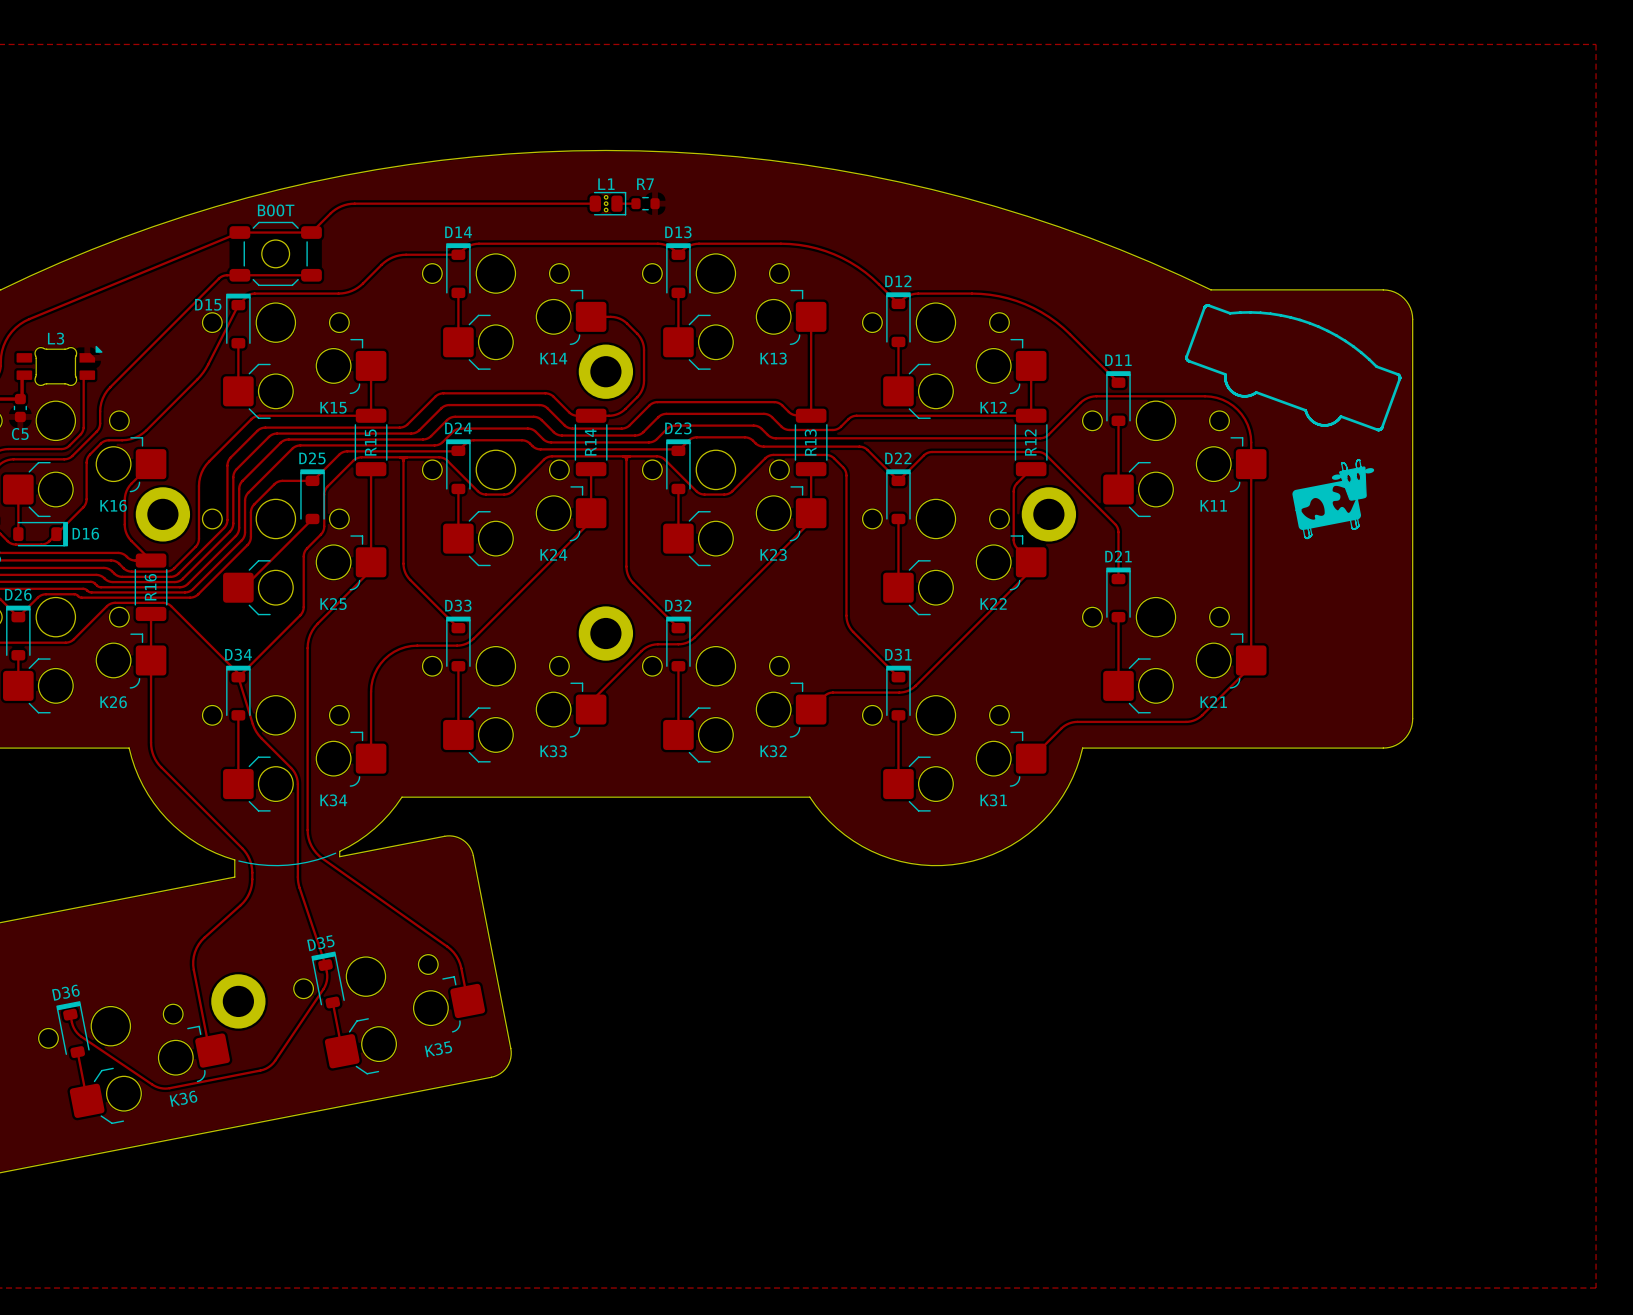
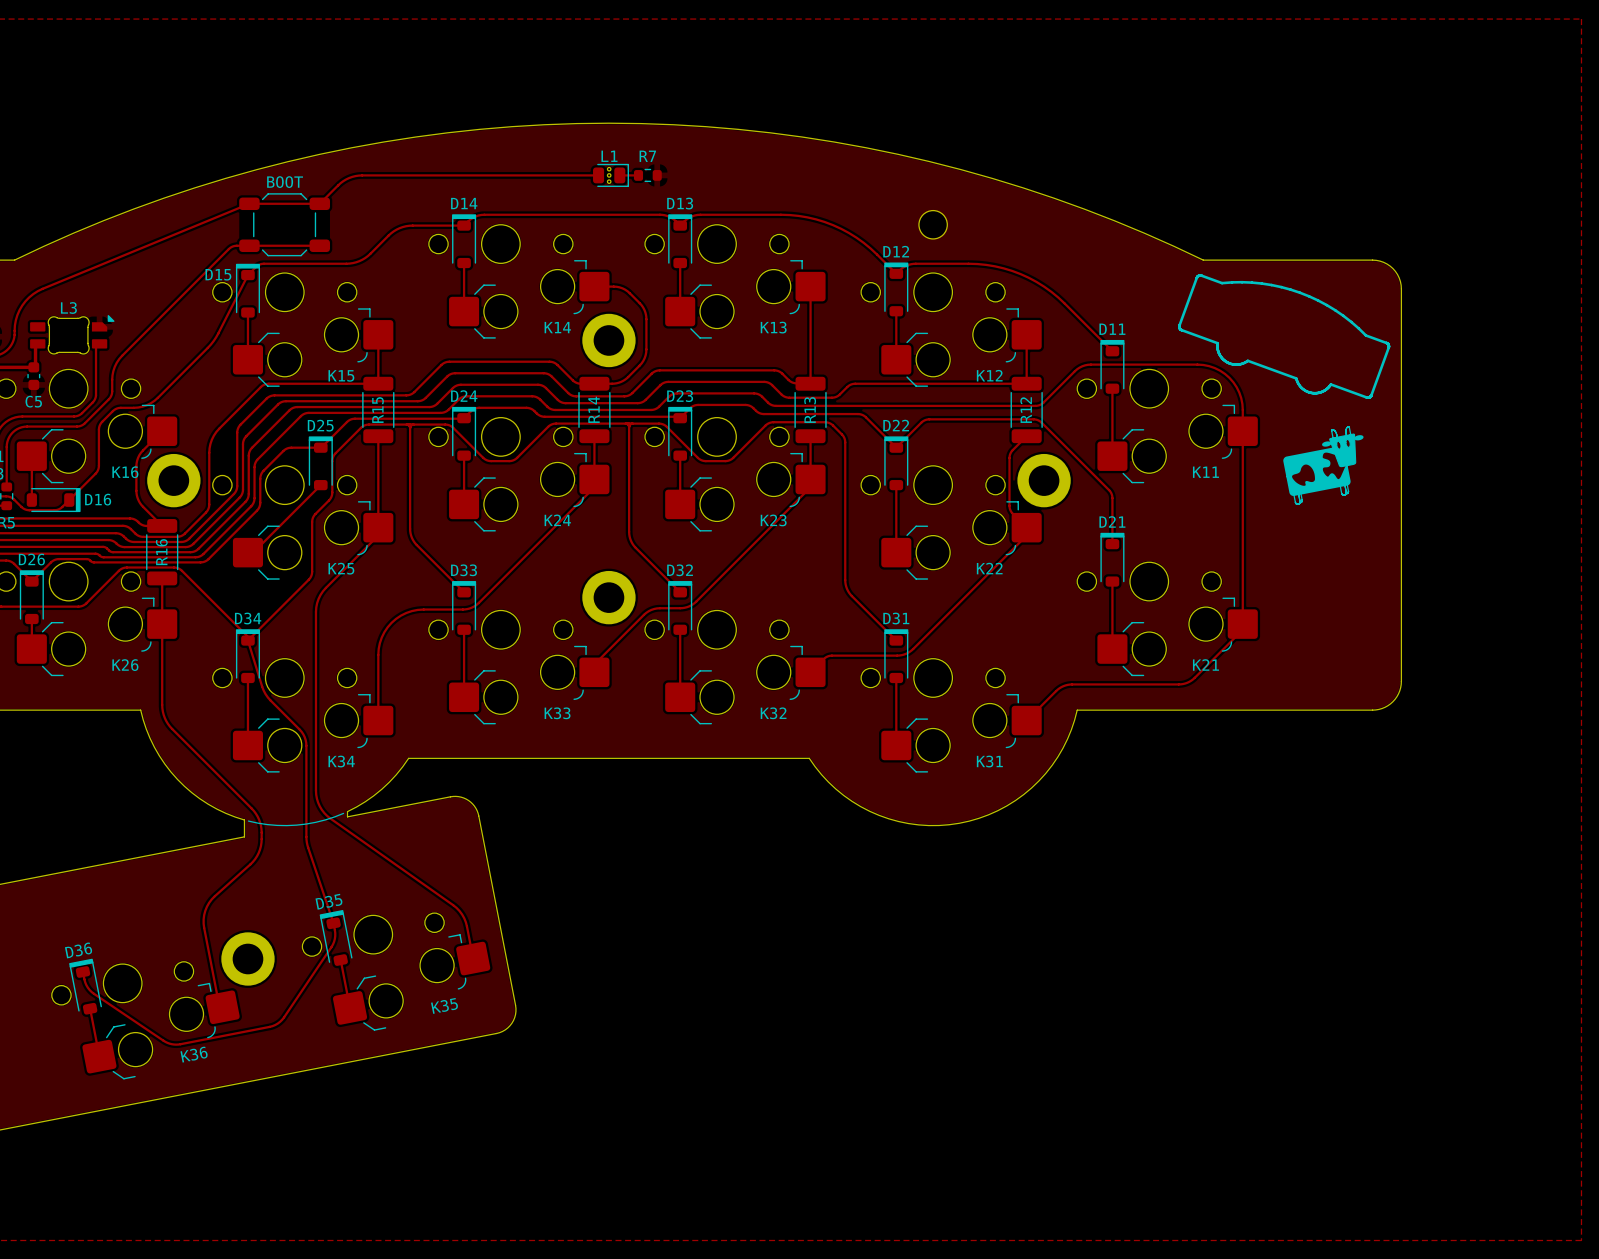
part footprint: [229, 221, 322, 287] -> [239, 193, 330, 257]
part: none -> (933, 224)

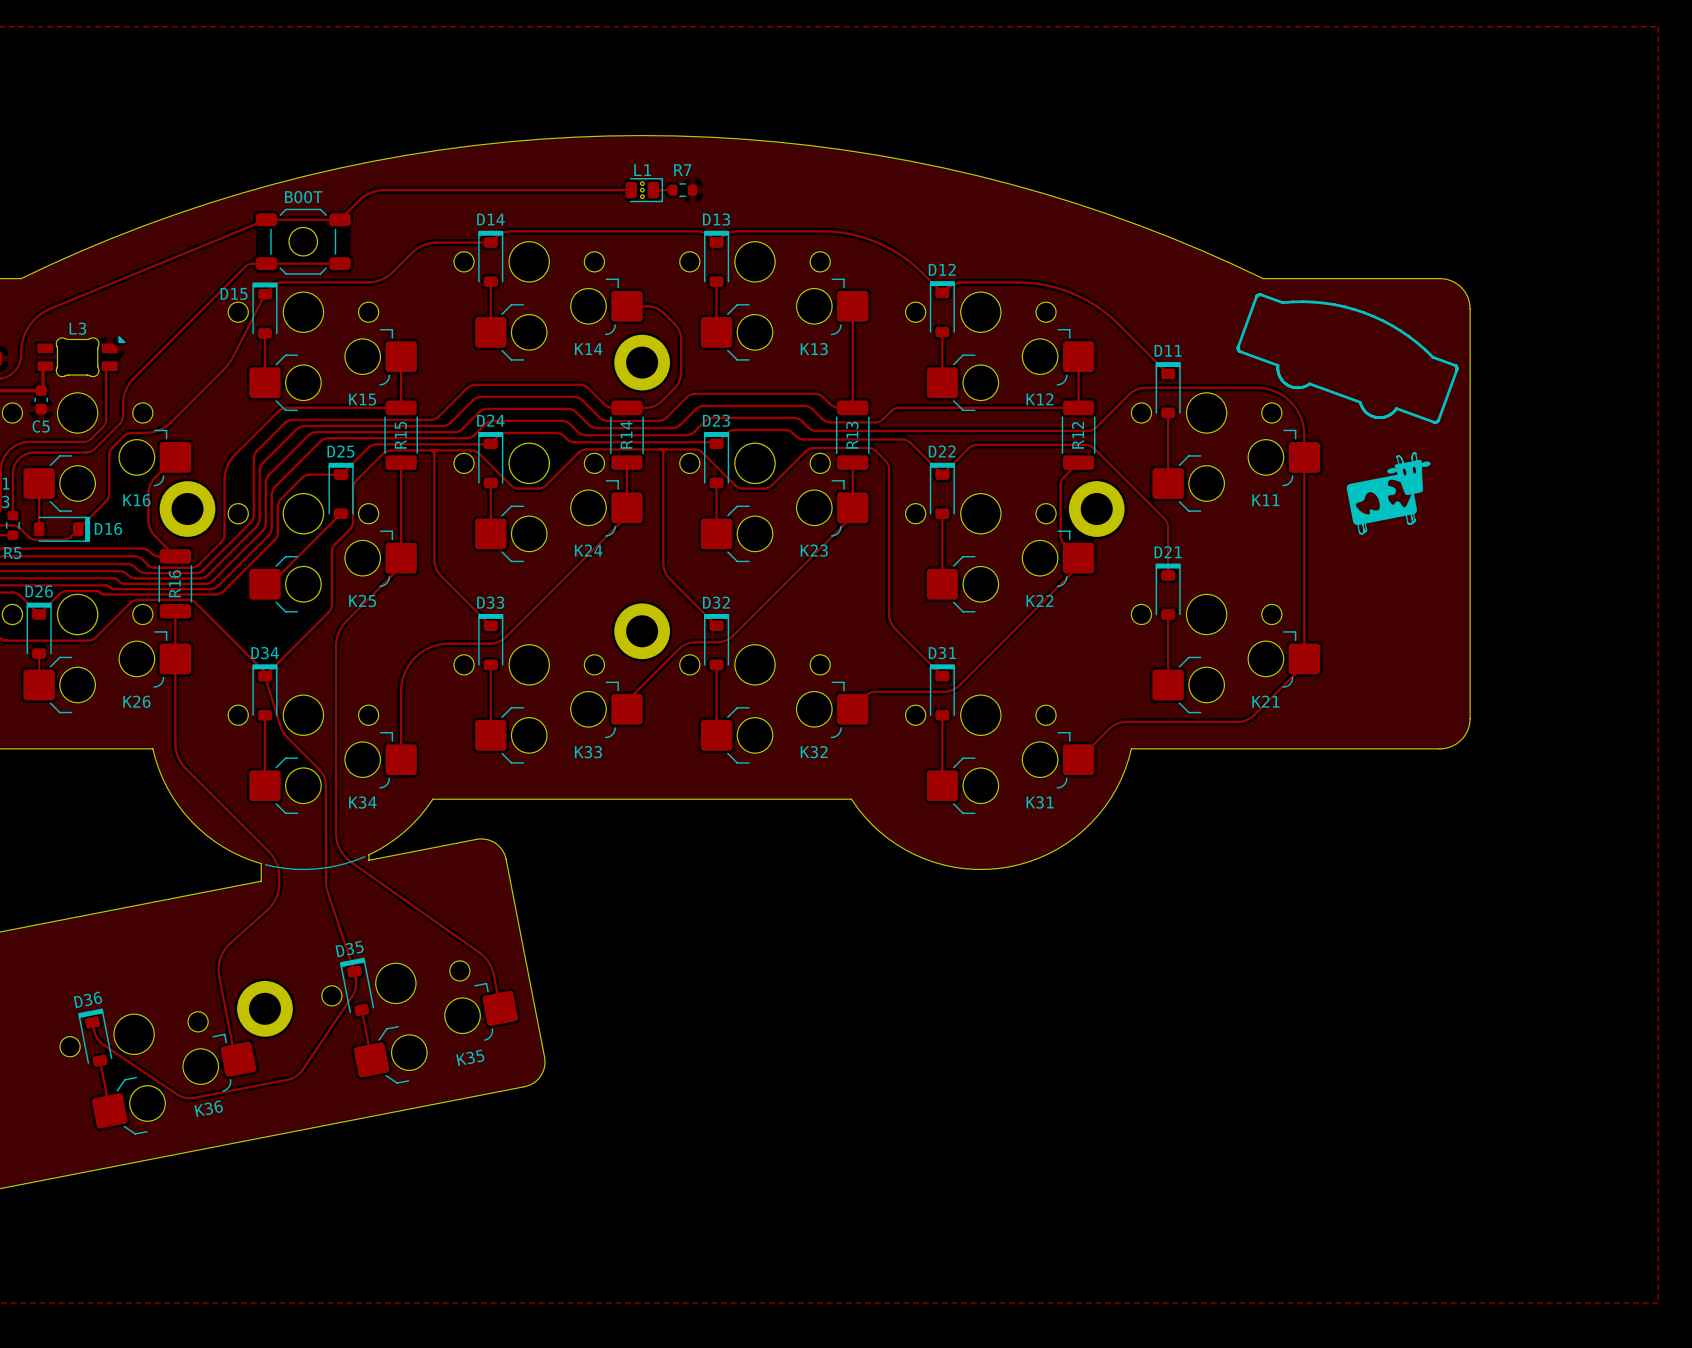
part footprint: [239, 193, 330, 257] -> [255, 208, 351, 275]
part: (933, 224) -> none

